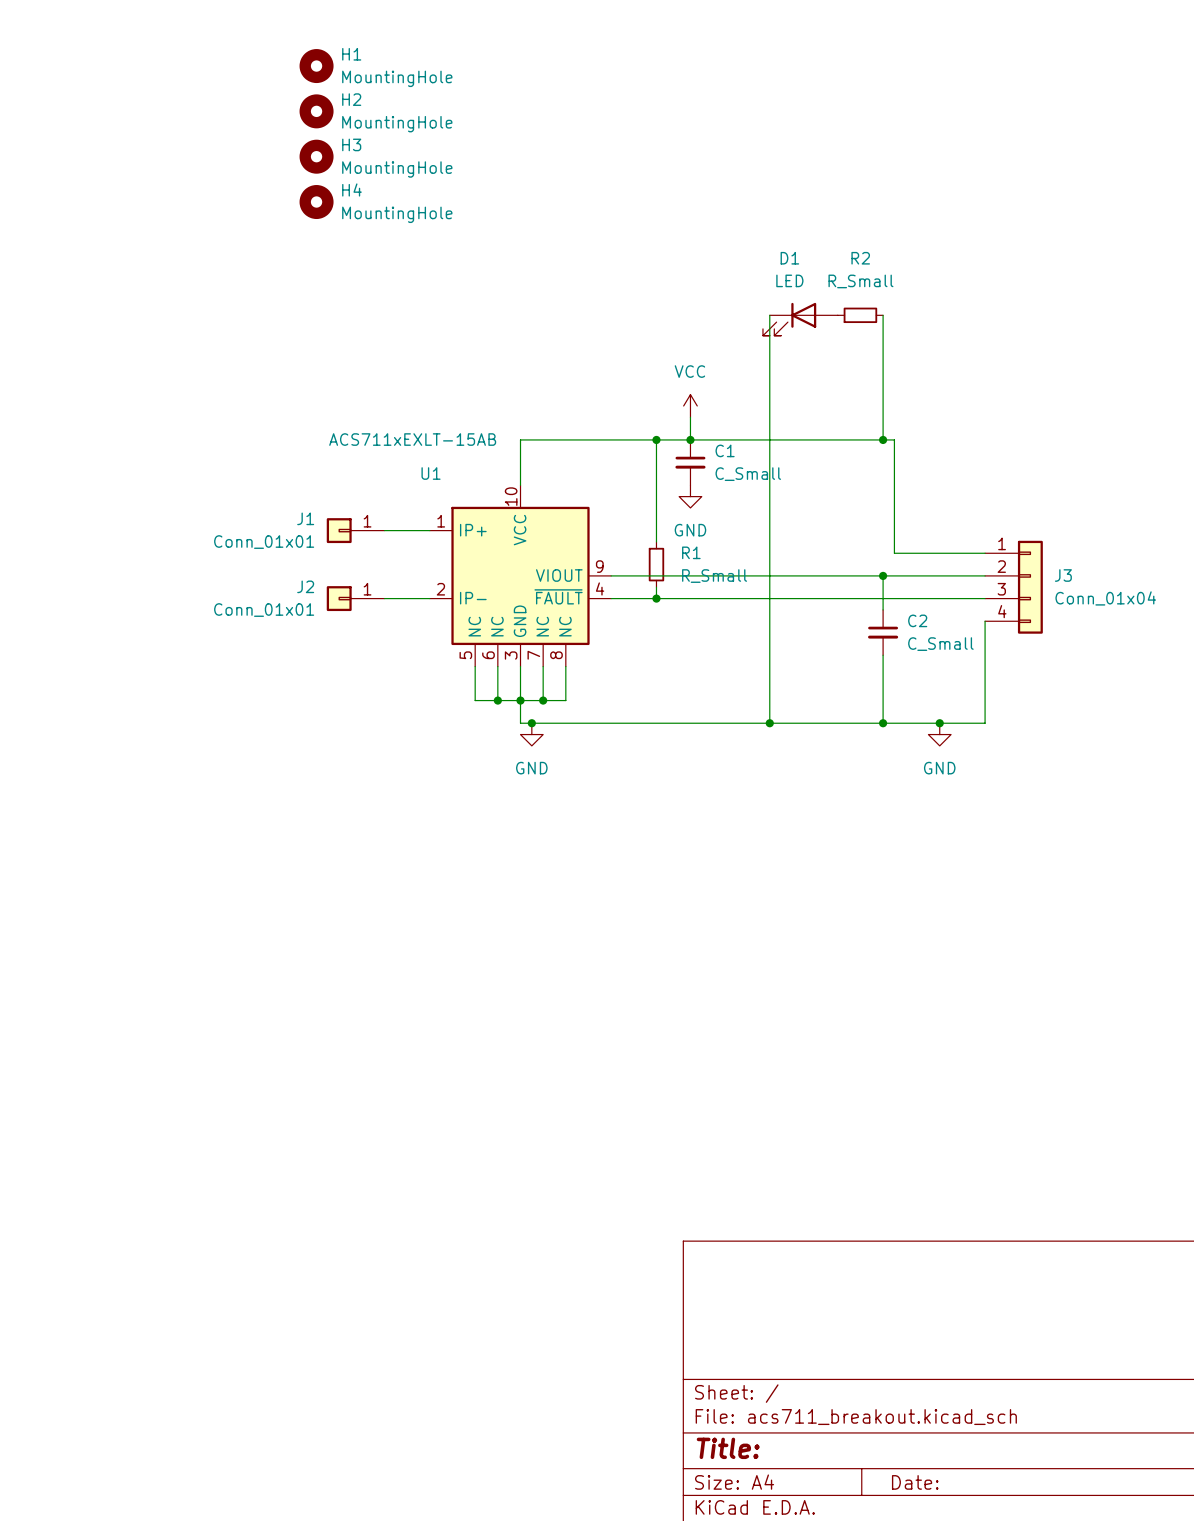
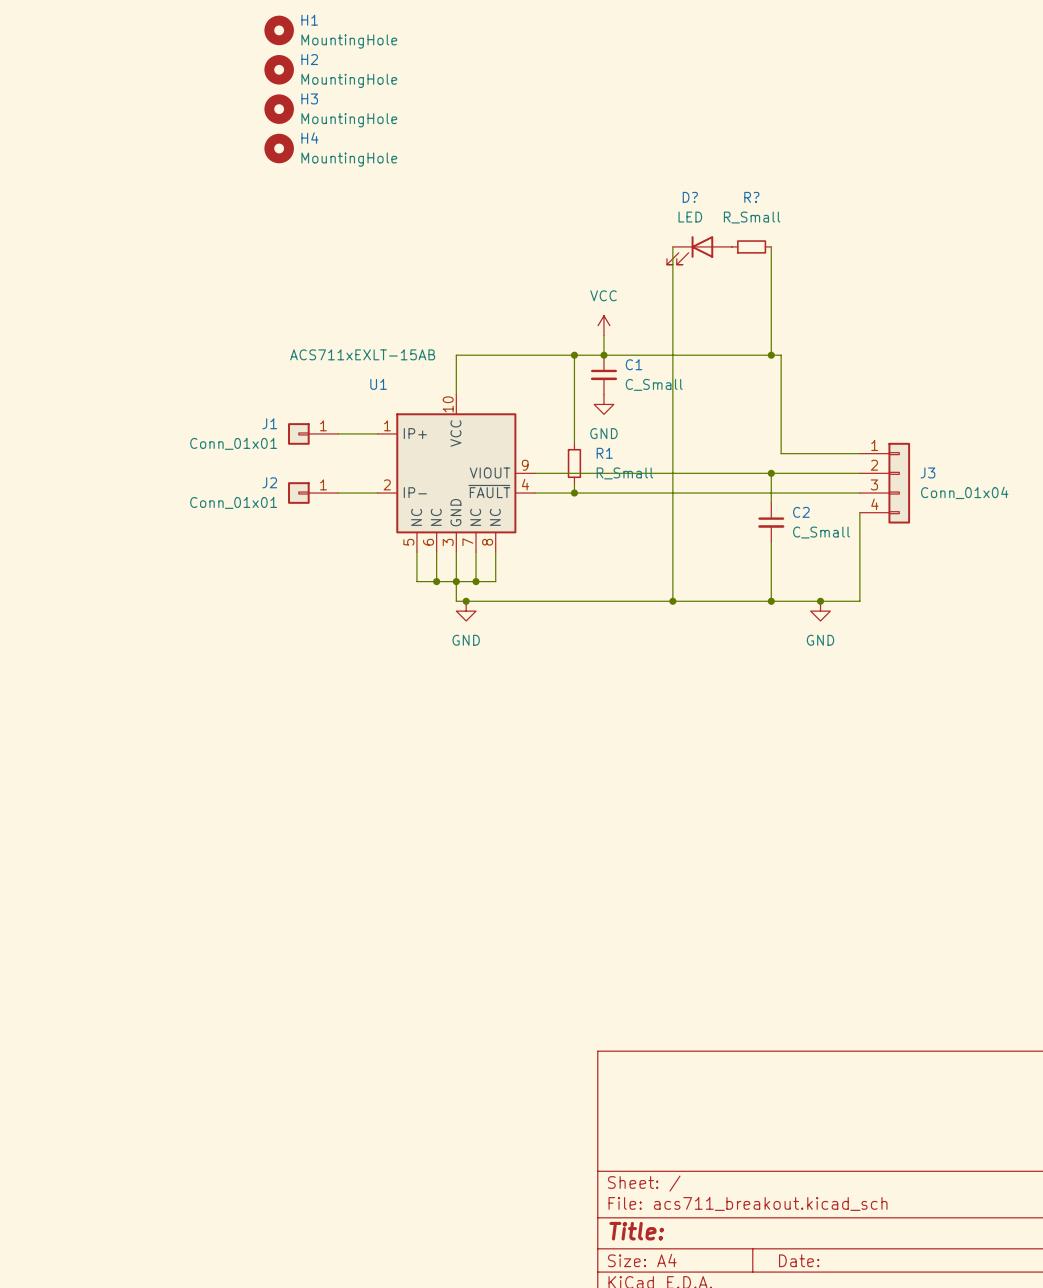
D1 name: D1 (789, 258) -> D? (690, 197)
R2 name: R2 (860, 258) -> R? (751, 197)

